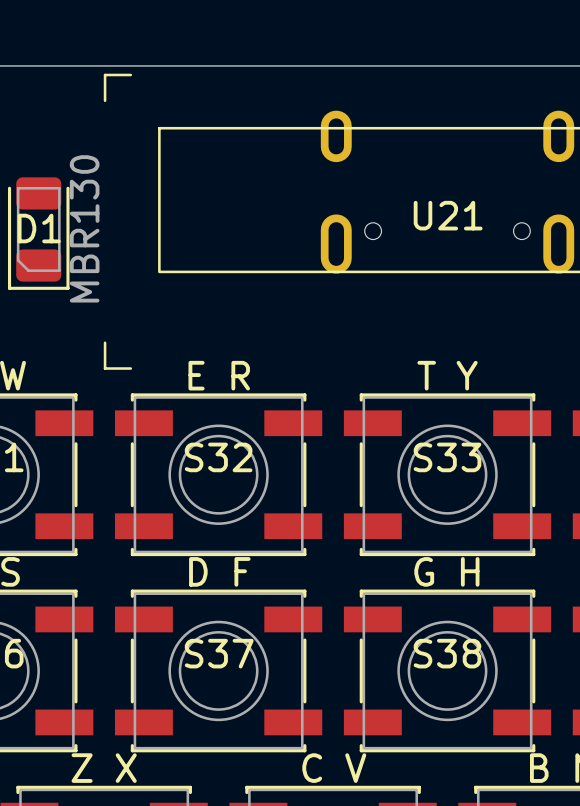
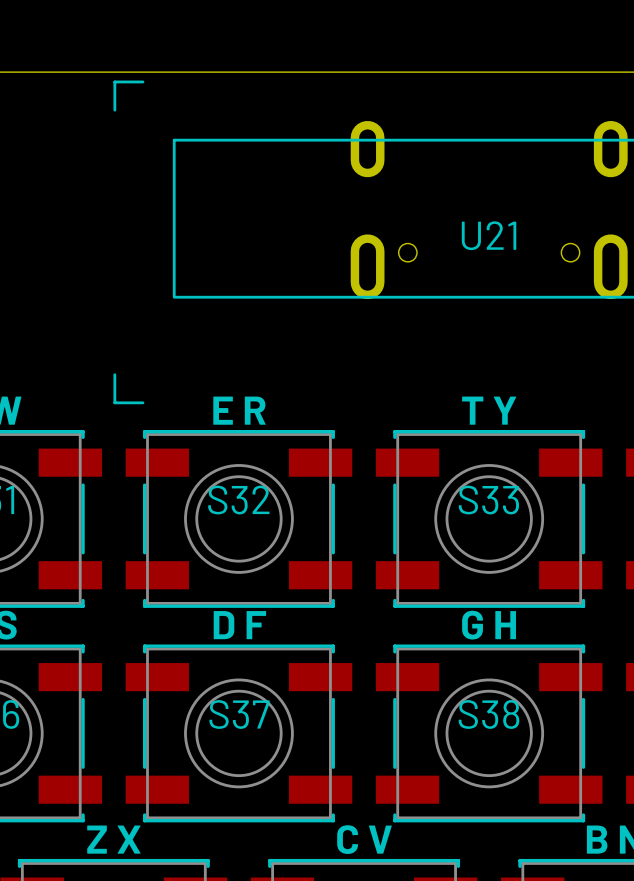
D1: MBR130 (38, 233) -> none

